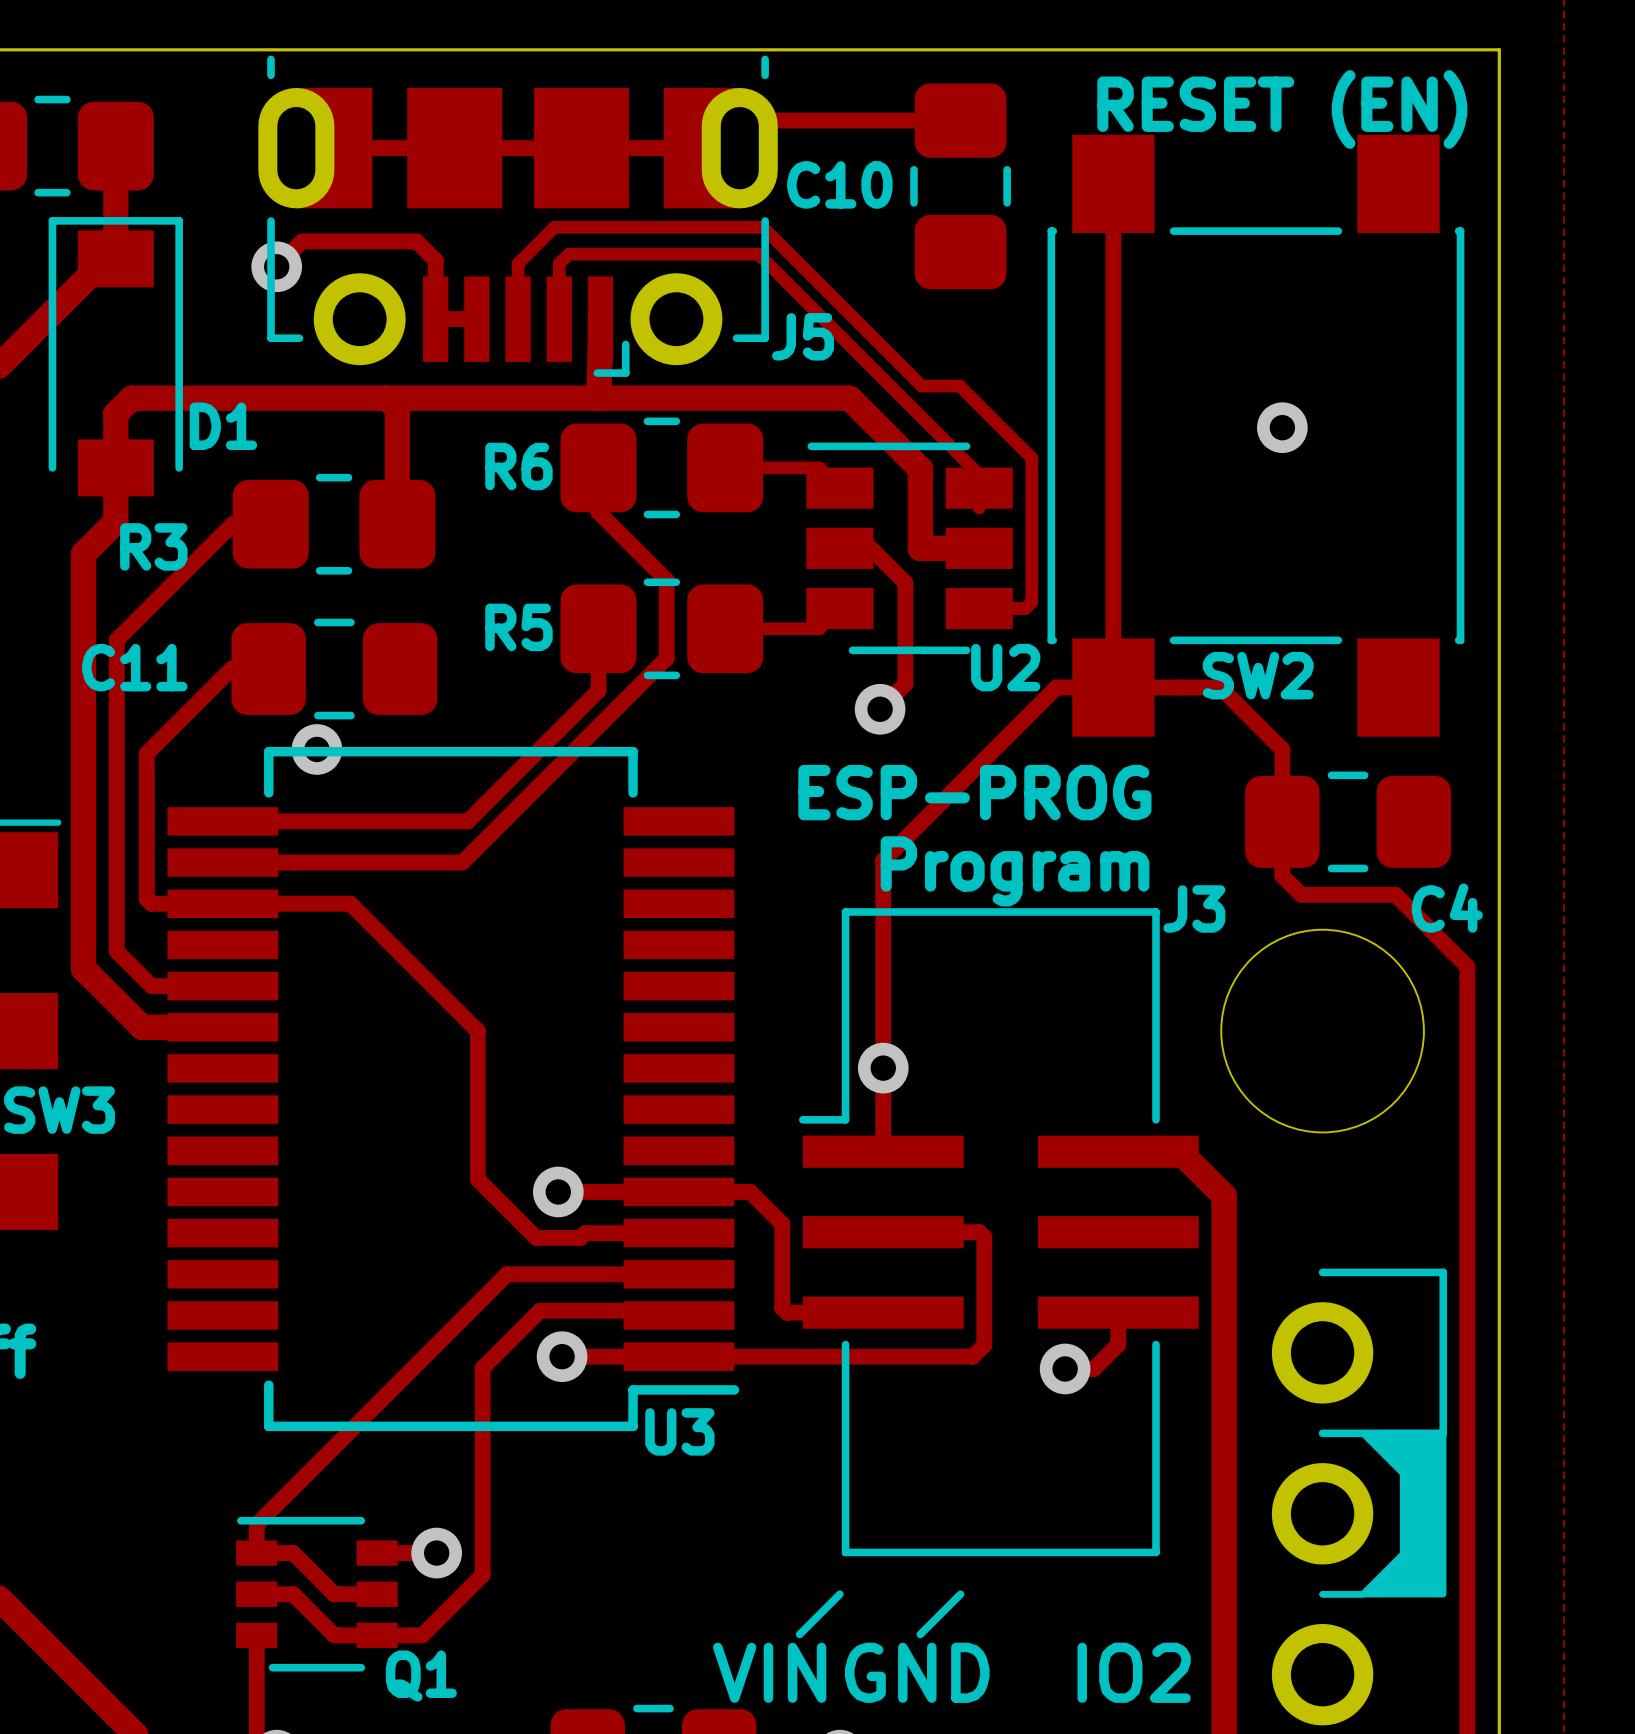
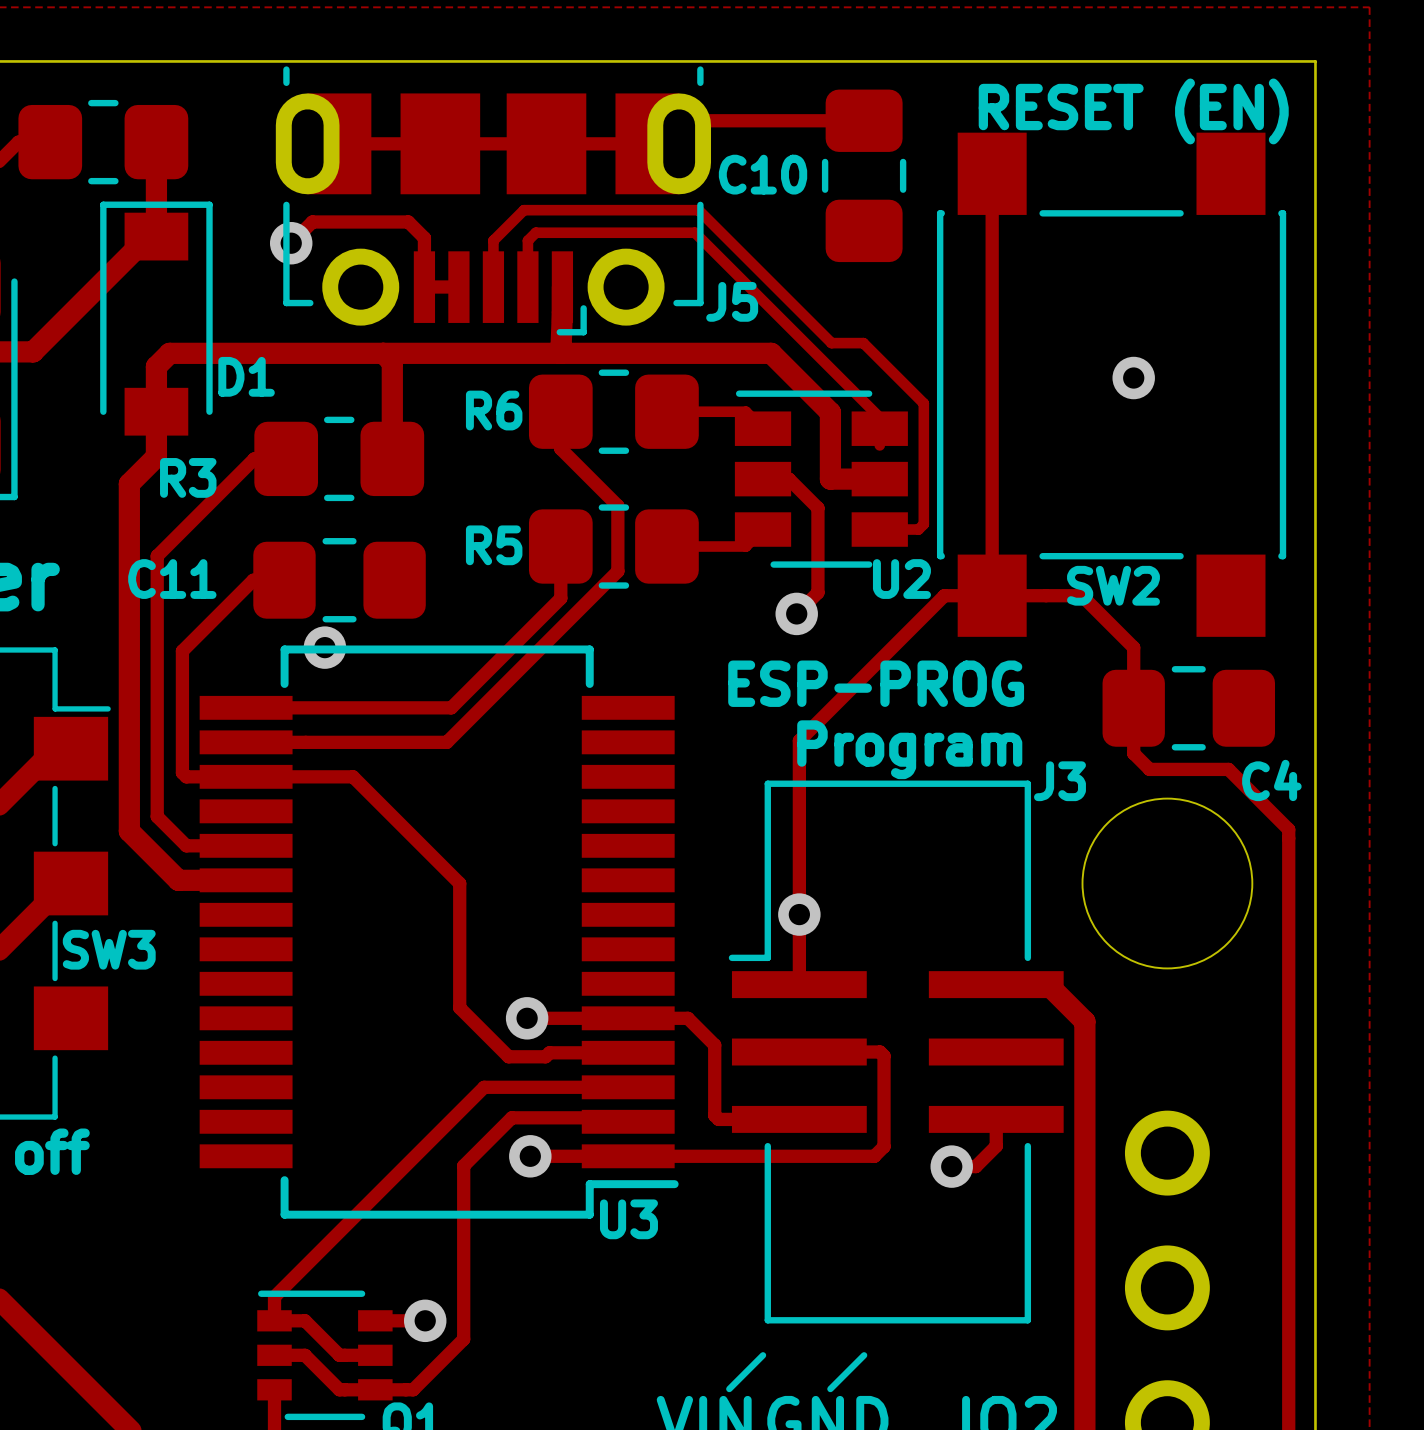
line: (1322, 1272) (1443, 1272) (1443, 1433) (1322, 1433) -> none
drawing: [1319, 1430, 1447, 1598] -> none

